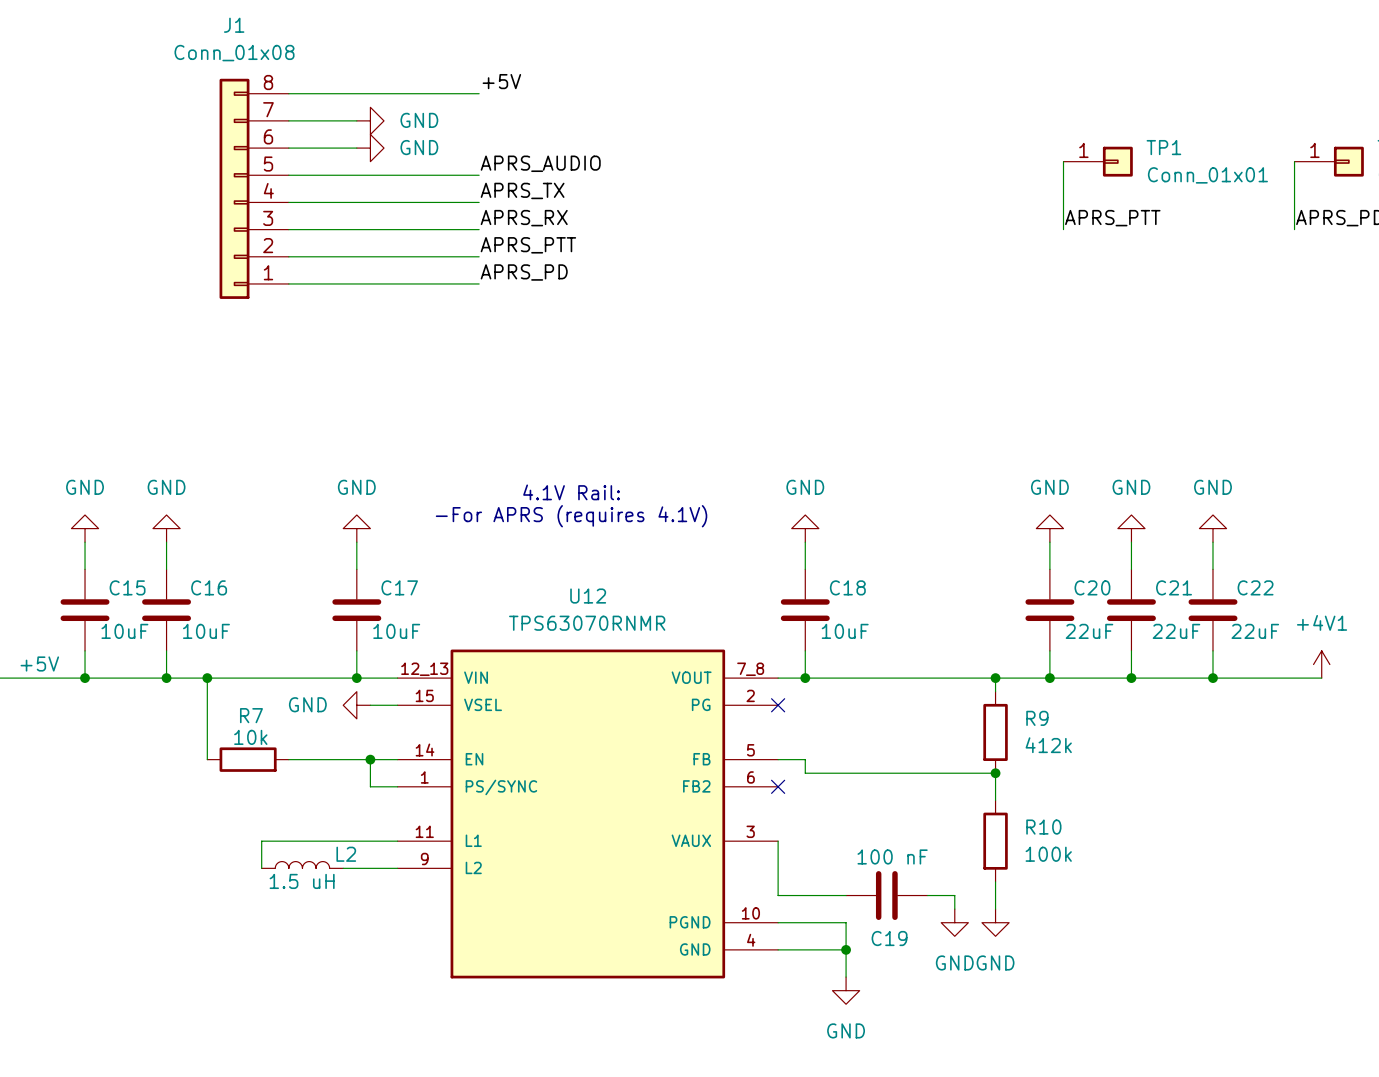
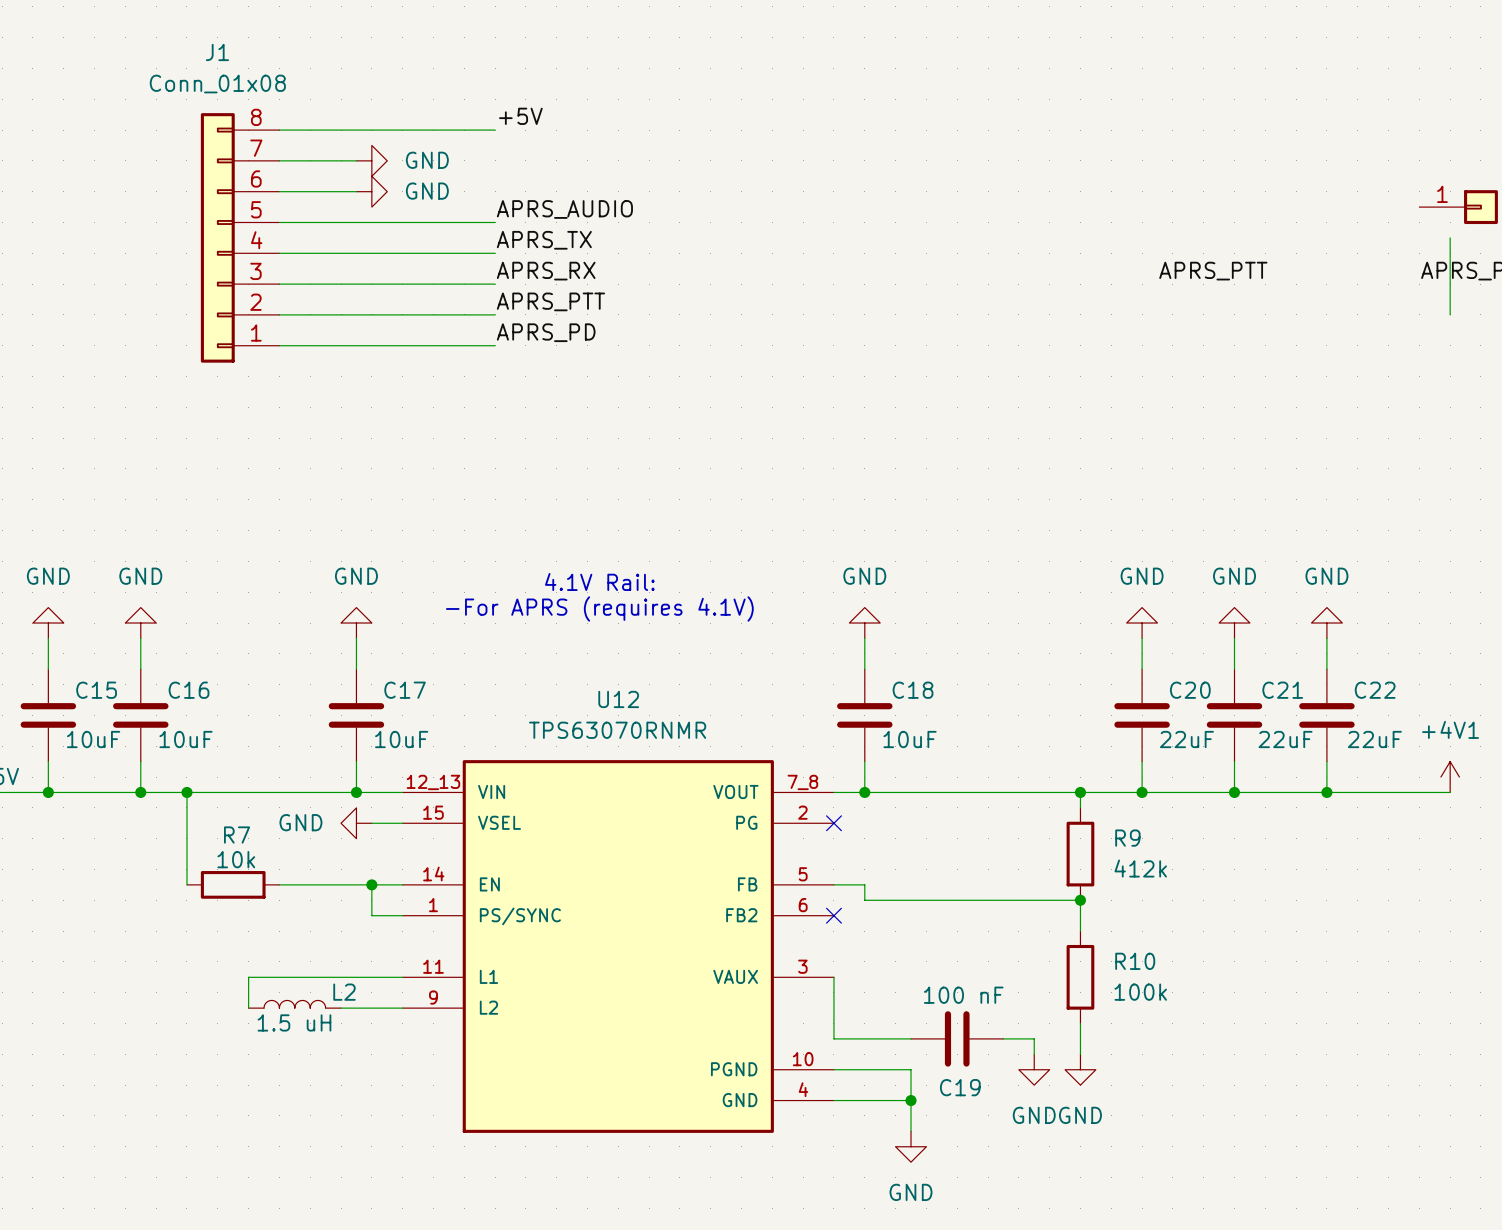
wire: (1063, 161) (1063, 229) -> none
TP1: Conn_01x01 (1098, 161) -> none
wire: (1294, 161) (1294, 229) -> (1450, 237) (1450, 314)

